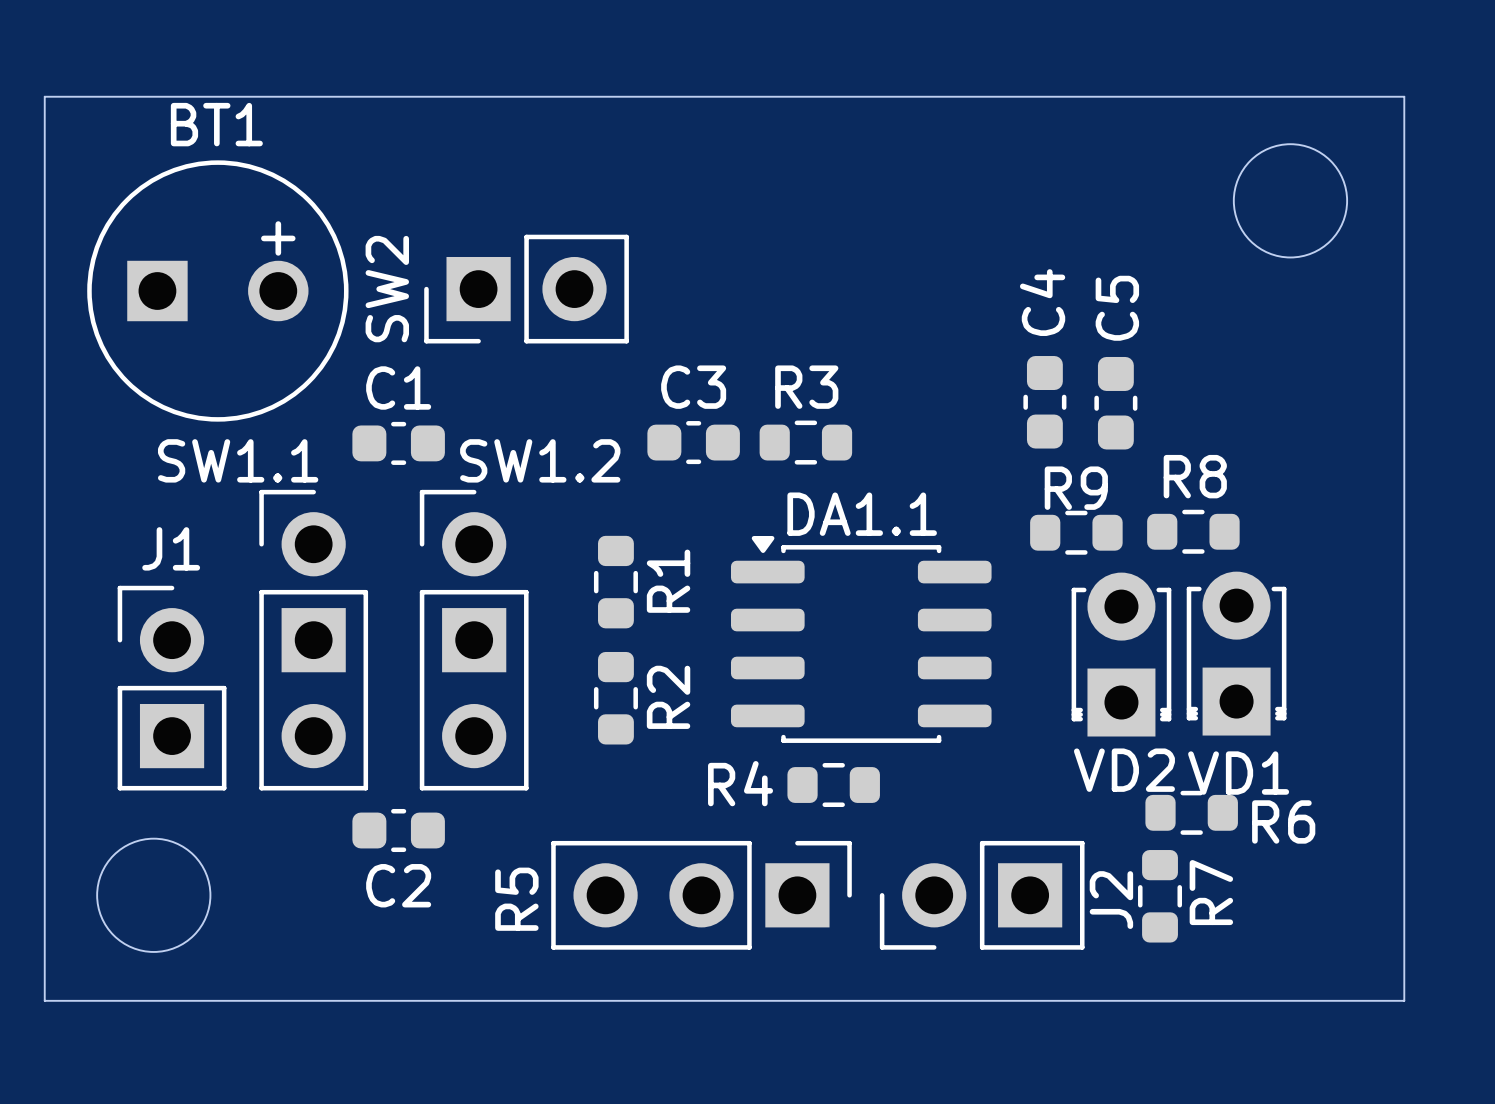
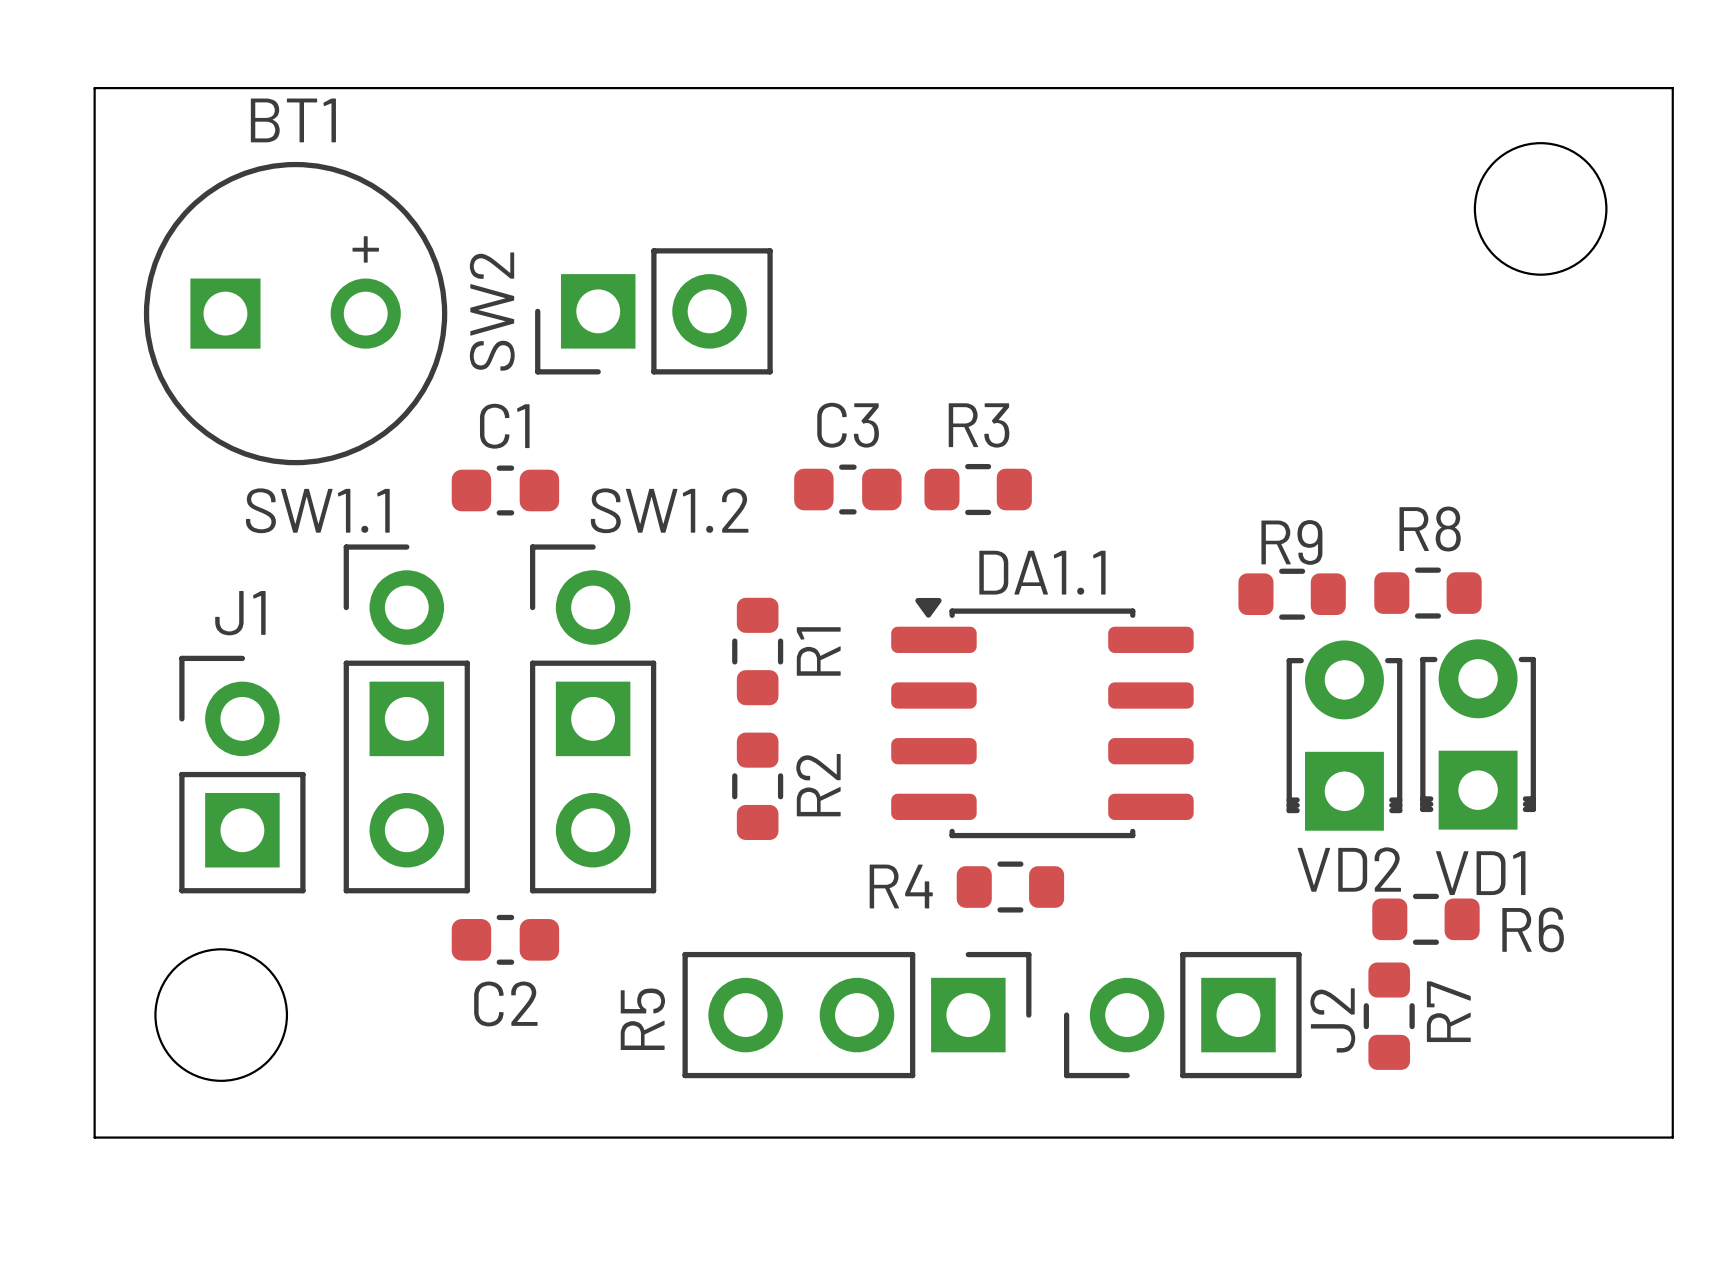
C4: (1044, 402) -> none
C5: (1115, 403) -> none

